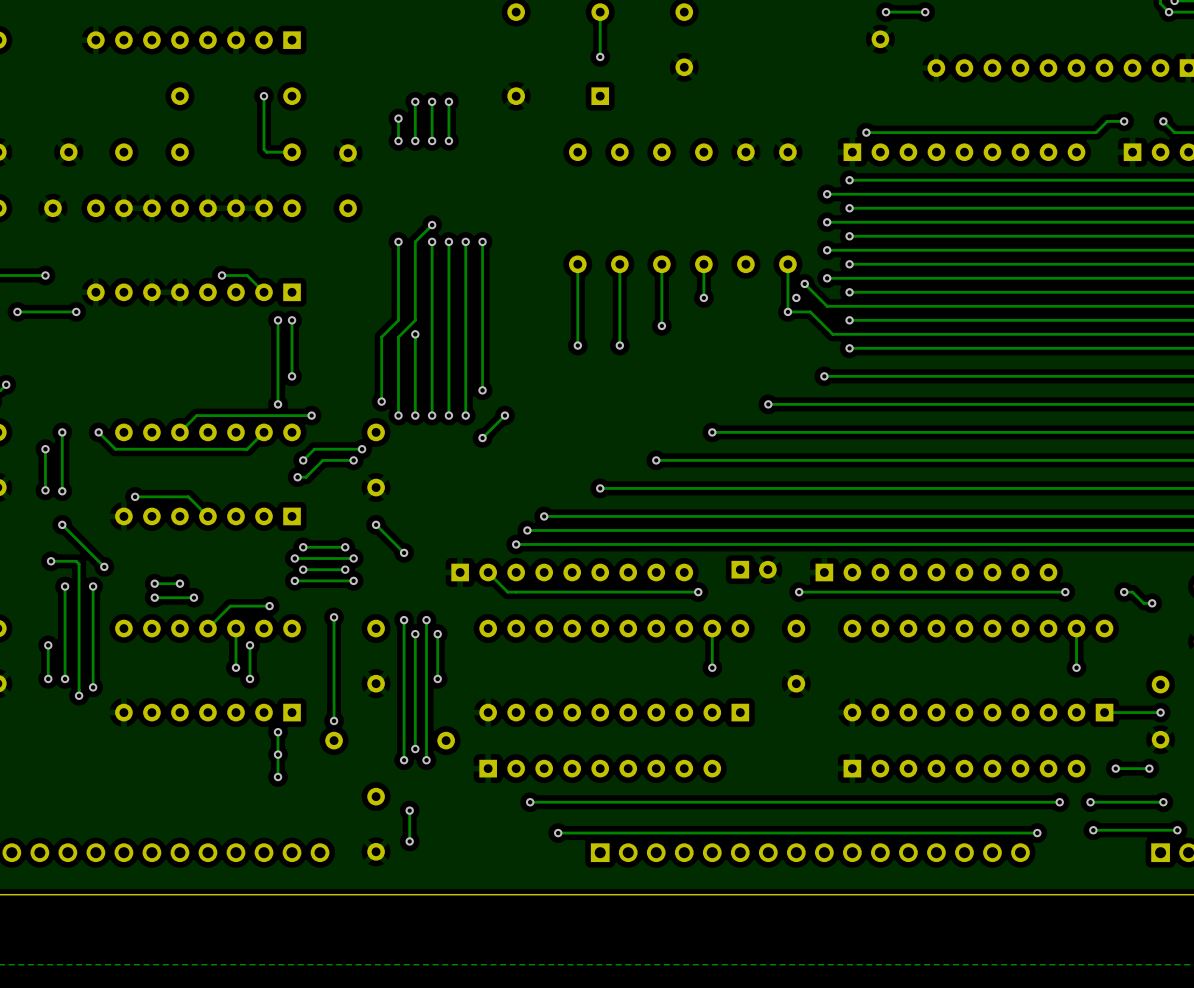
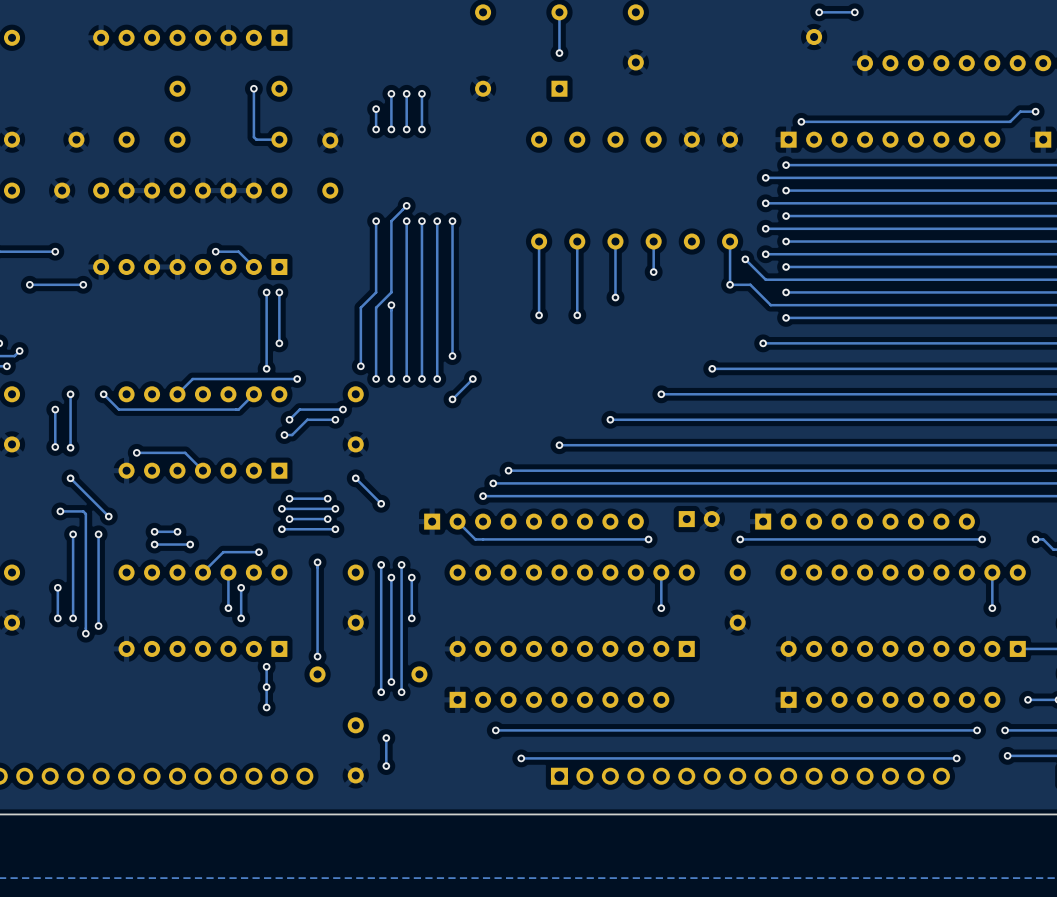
via: (796, 297) -> none

